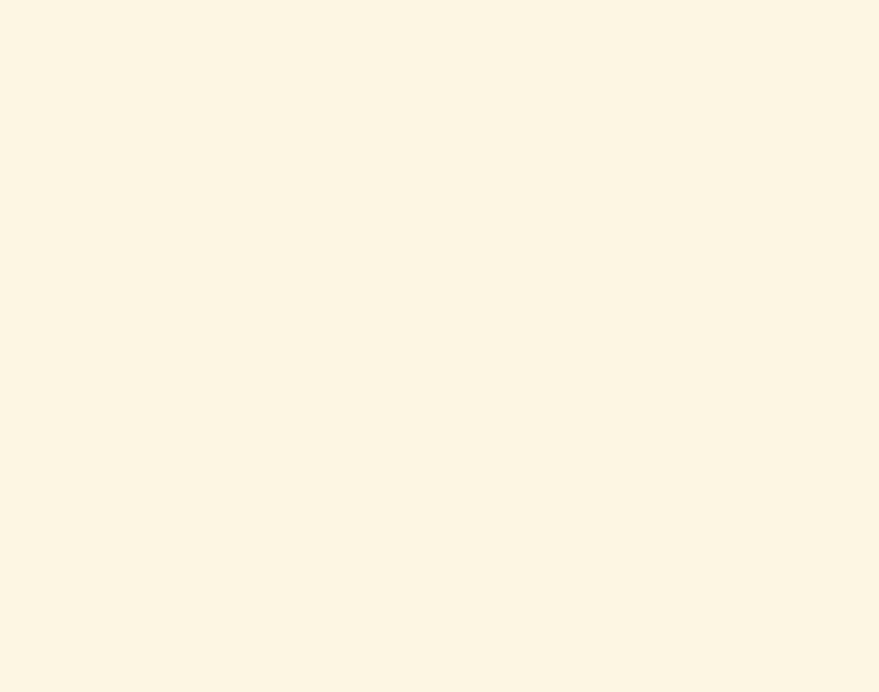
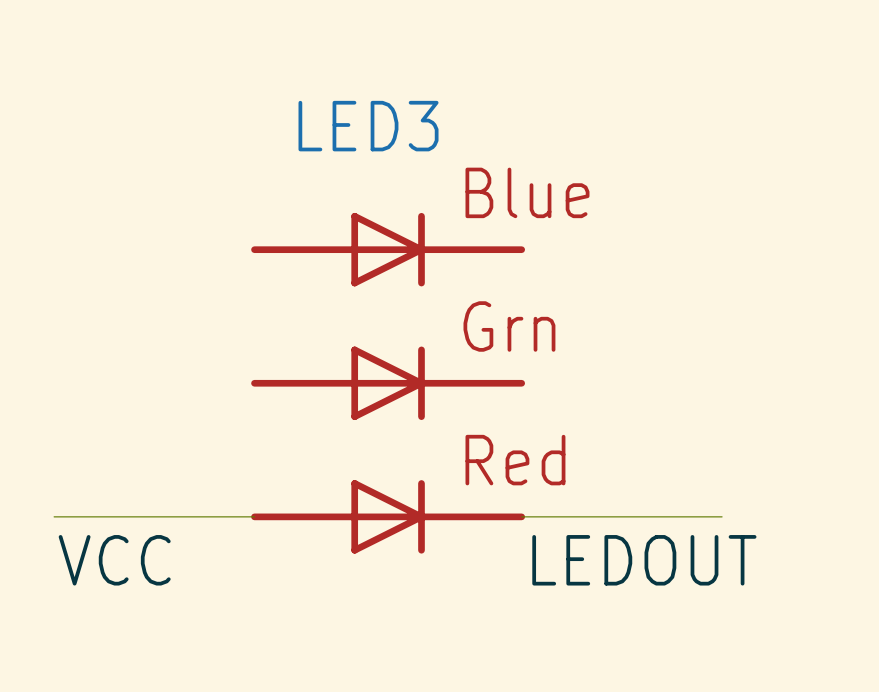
LED3: none -> (388, 383)
wire: none -> (54, 516) (254, 516)
wire: none -> (521, 516) (722, 516)
label: none -> VCC (114, 560)
label: none -> LEDOUT (644, 560)

